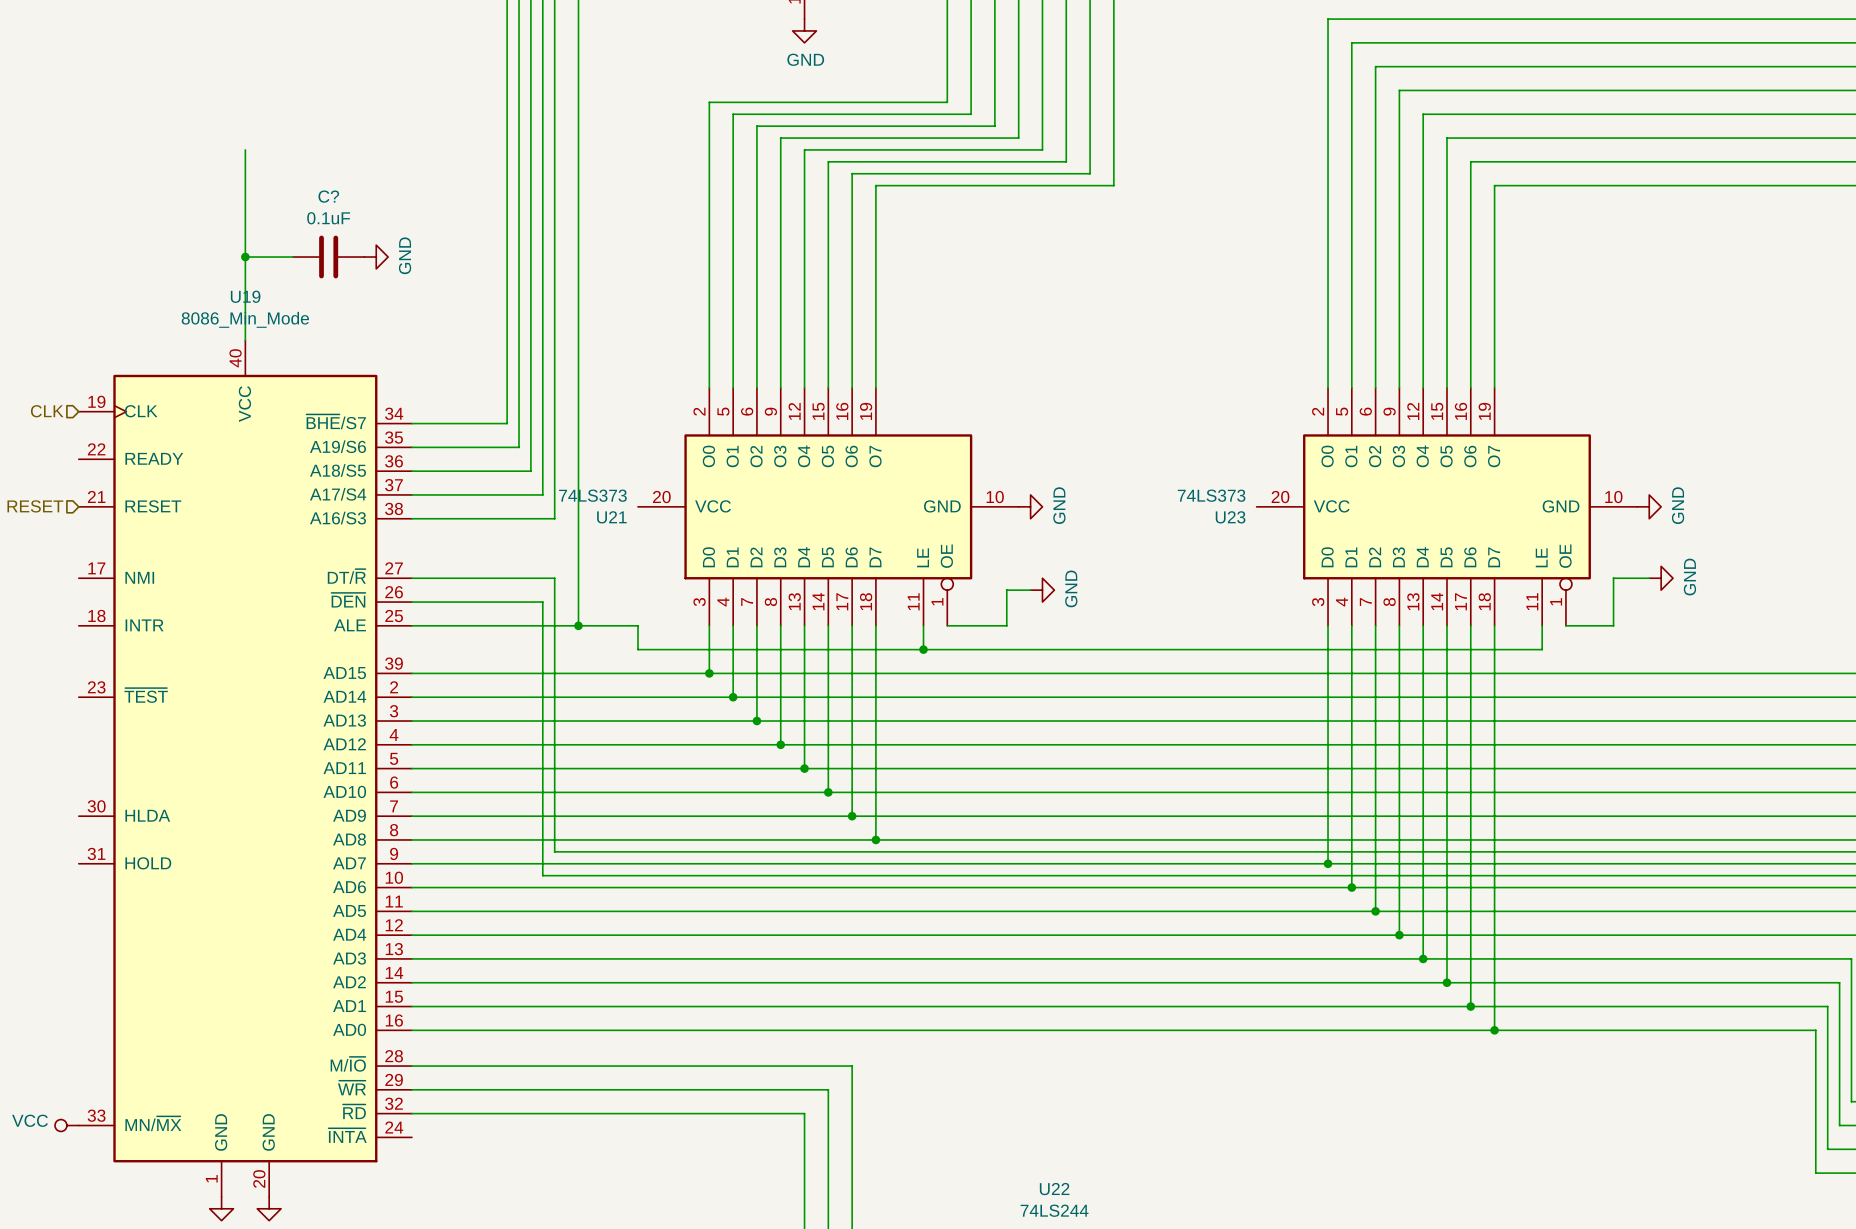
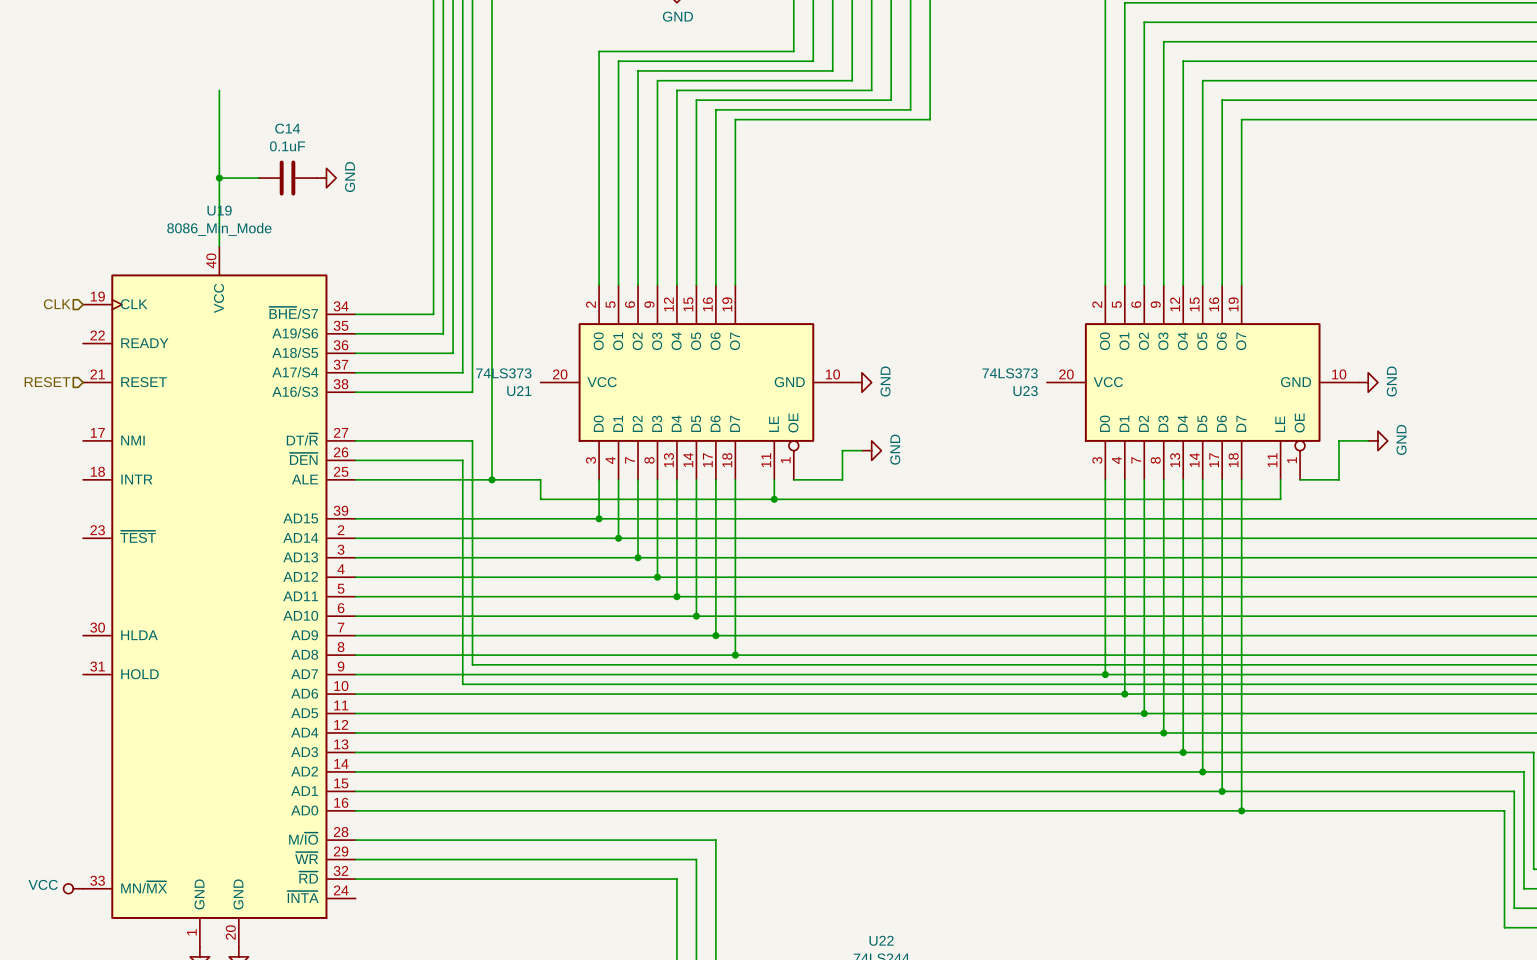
C? name: C? (328, 196) -> C14 (287, 128)

